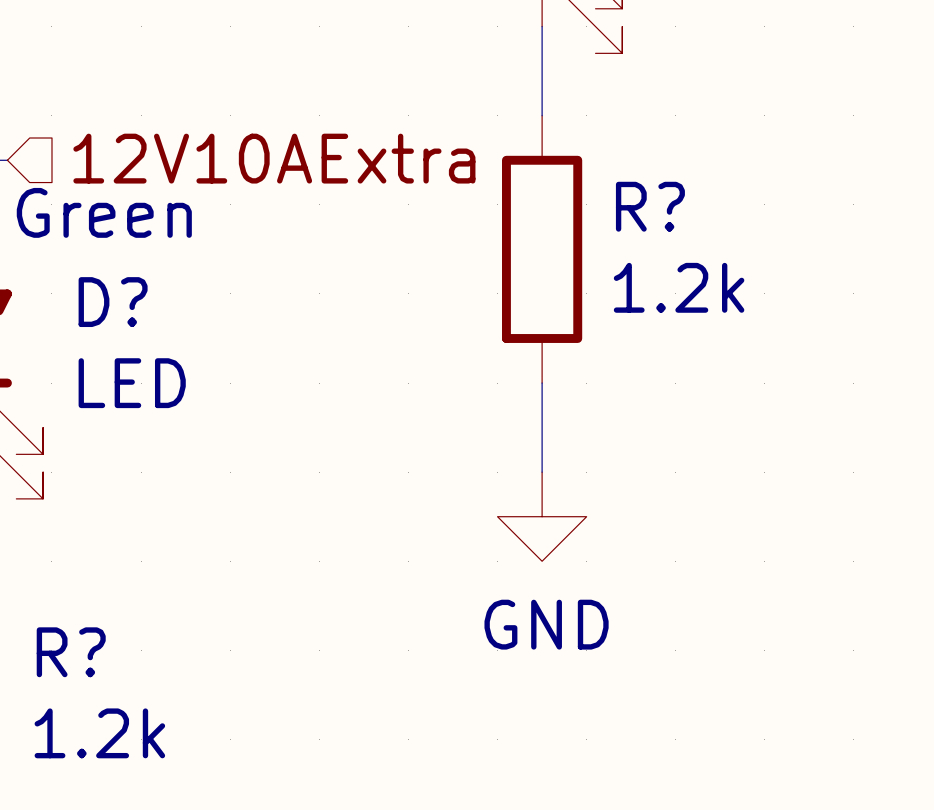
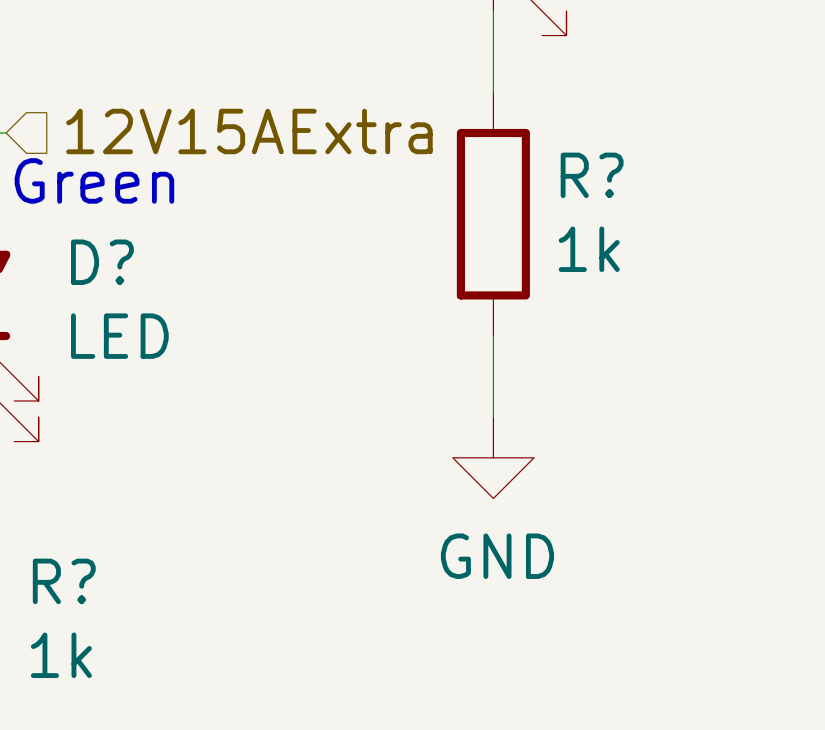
hierarchical label: 12V10AExtra (274, 158) -> 12V15AExtra (249, 131)
R? value: 1.2k (679, 287) -> 1k (589, 249)
R? value: 1.2k (99, 733) -> 1k (61, 655)

